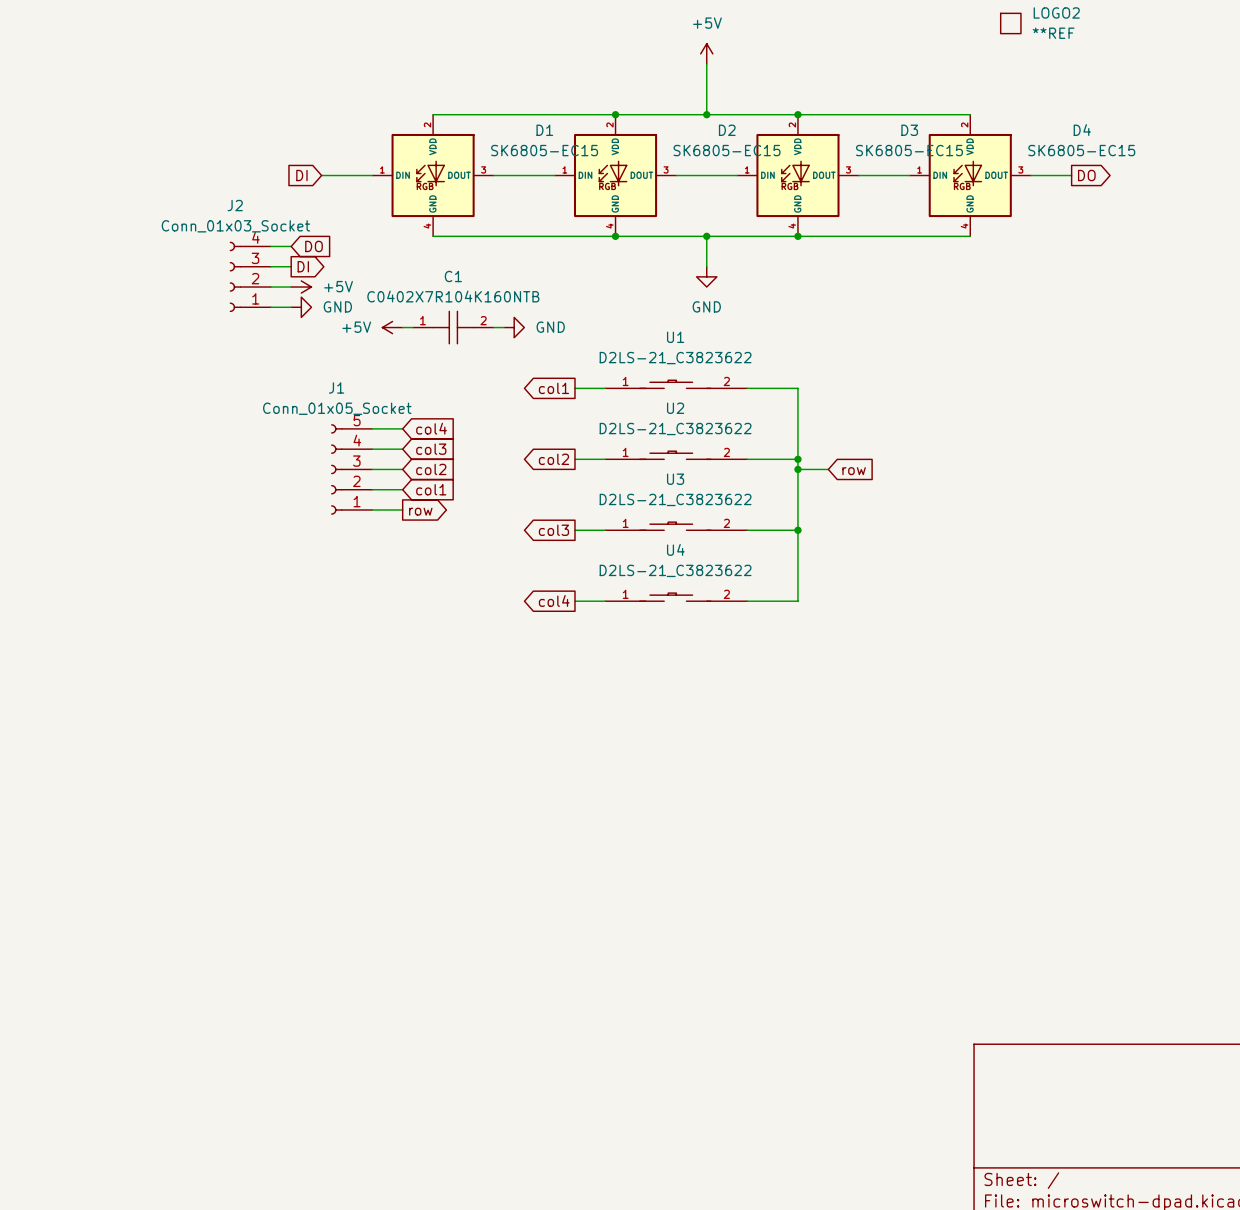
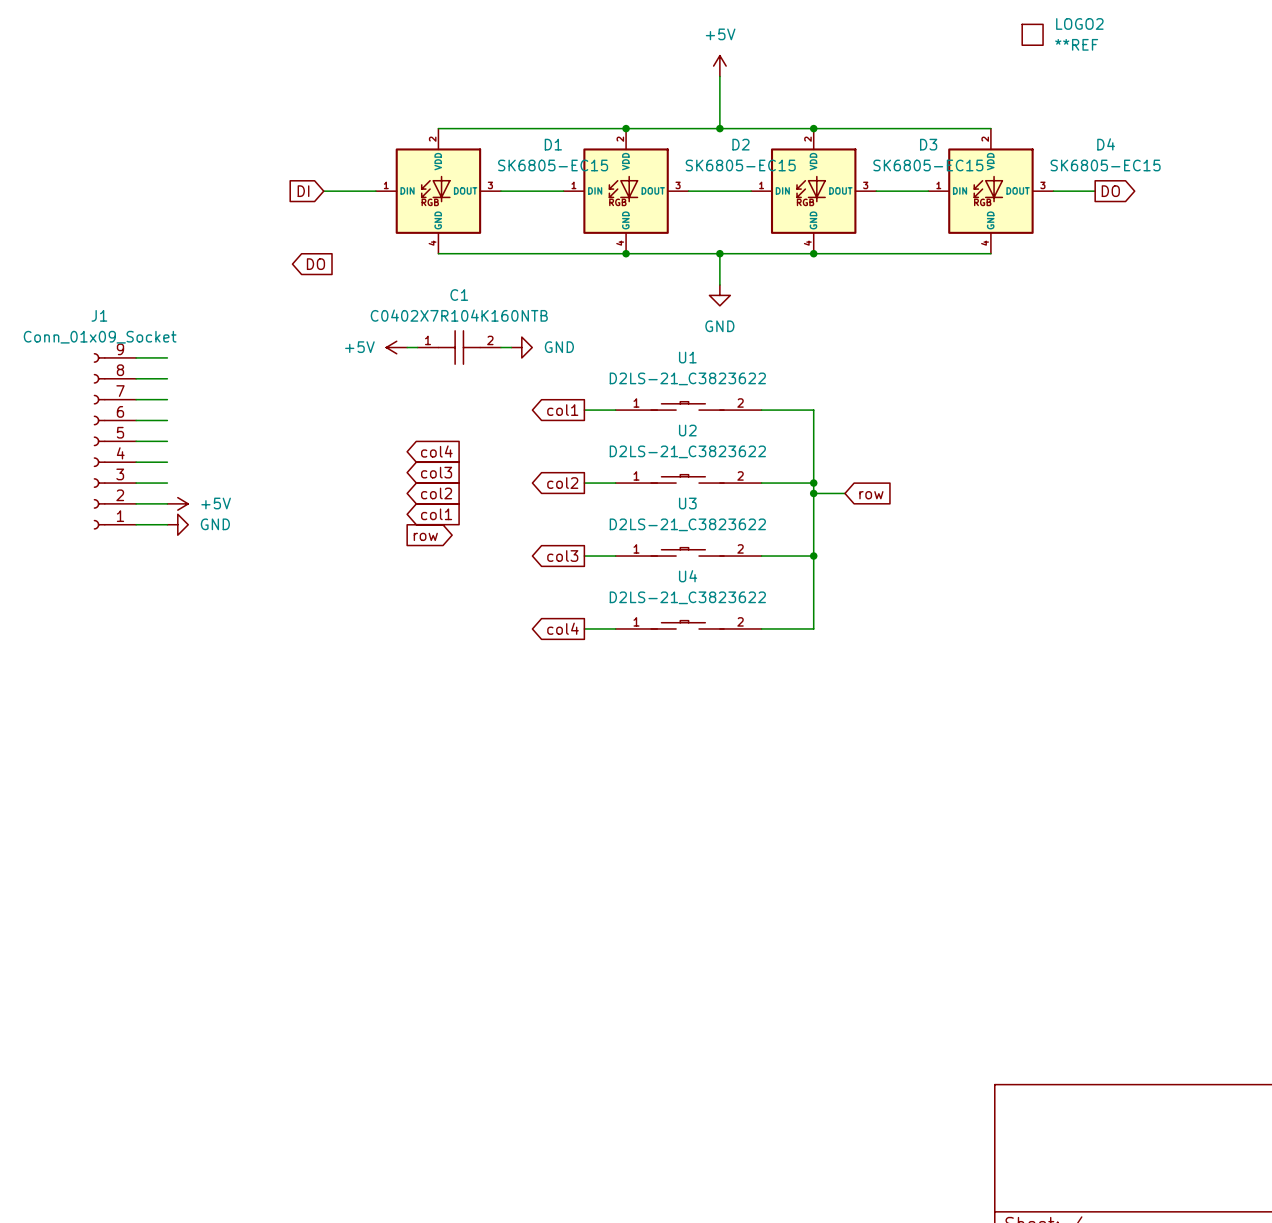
wire: (270, 246) (291, 246) -> none
wire: (270, 266) (291, 266) -> none
global label: DI (303, 266) -> none
J2: Conn_01x03_Socket (250, 276) -> none
wire: (270, 287) (291, 287) -> none
power symbol: +5V (301, 287) -> none
wire: (270, 307) (291, 307) -> none
power symbol: GND (301, 307) -> none
wire: none -> (136, 357) (167, 357)
wire: none -> (136, 378) (167, 378)
wire: none -> (136, 399) (167, 399)
J1 name position: J1 (336, 387) -> J1 (99, 315)
wire: none -> (136, 420) (167, 420)
J1 value: Conn_01x05_Socket (337, 408) -> Conn_01x09_Socket (100, 337)
wire: none -> (136, 441) (167, 441)
J1 symbol: [331, 424, 373, 515] -> [93, 353, 137, 530]
wire: (372, 428) (402, 428) -> none
wire: none -> (136, 462) (167, 462)
wire: (372, 449) (402, 449) -> none
wire: none -> (136, 483) (167, 483)
wire: (372, 469) (402, 469) -> none
wire: none -> (136, 503) (167, 503)
power symbol: none -> +5V (177, 503)
wire: (372, 489) (402, 489) -> none
wire: none -> (136, 524) (167, 524)
power symbol: none -> GND (177, 524)
wire: (372, 509) (402, 509) -> none

